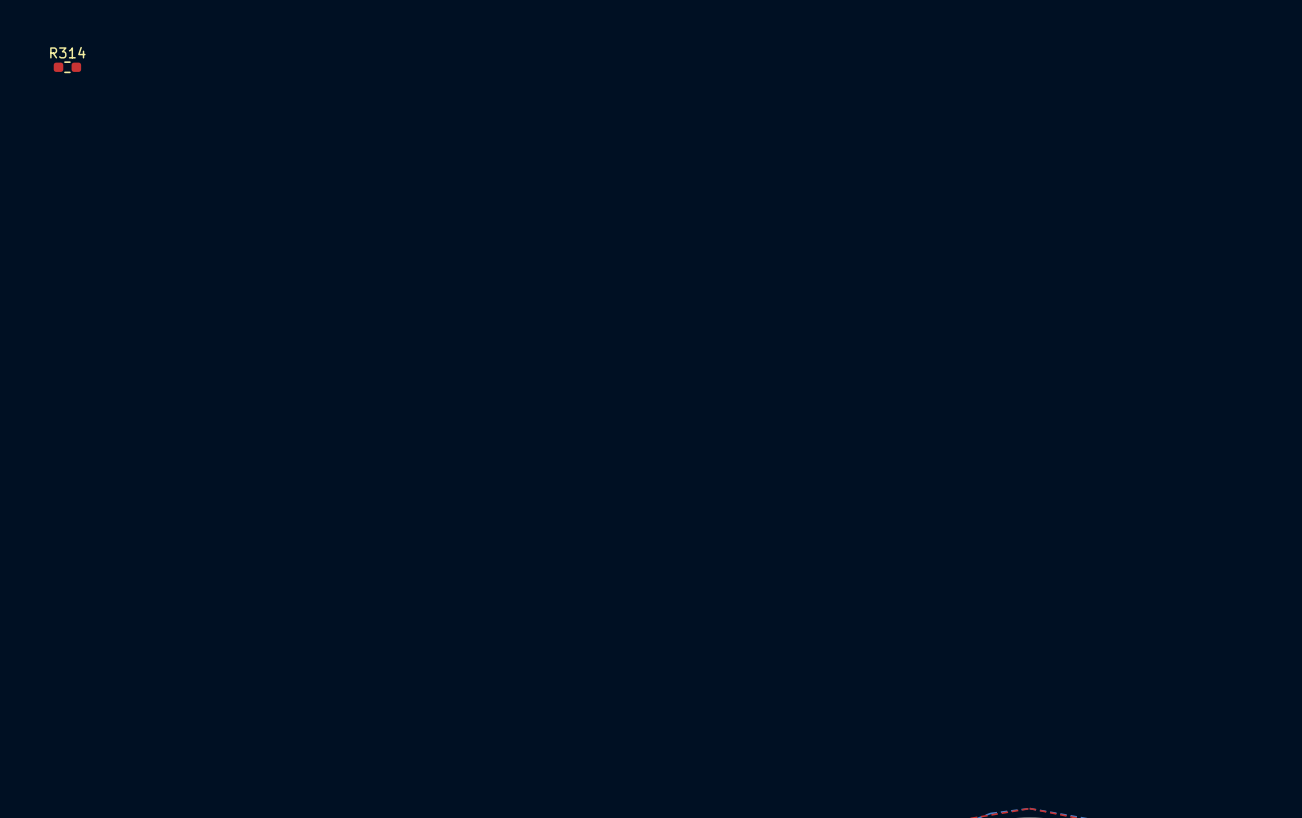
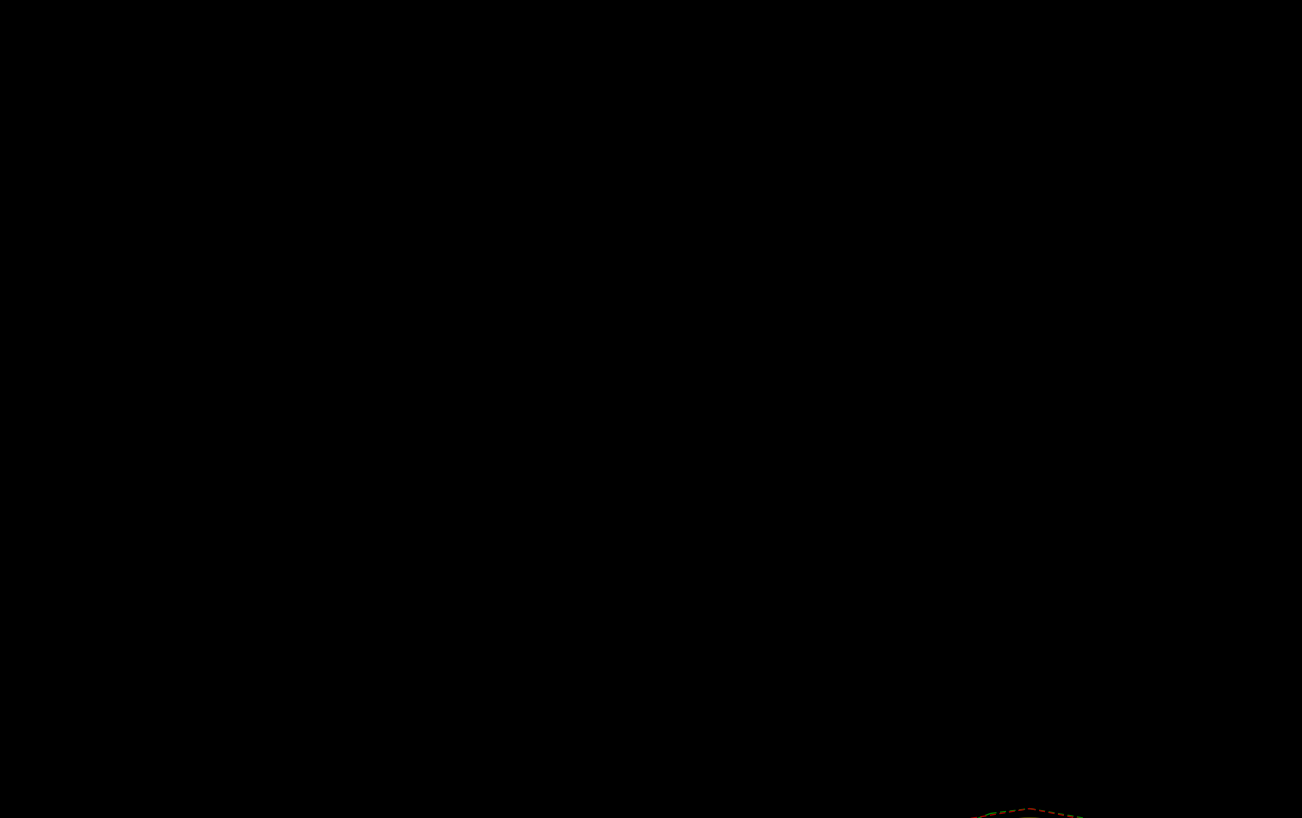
R314: (67, 67) -> none

